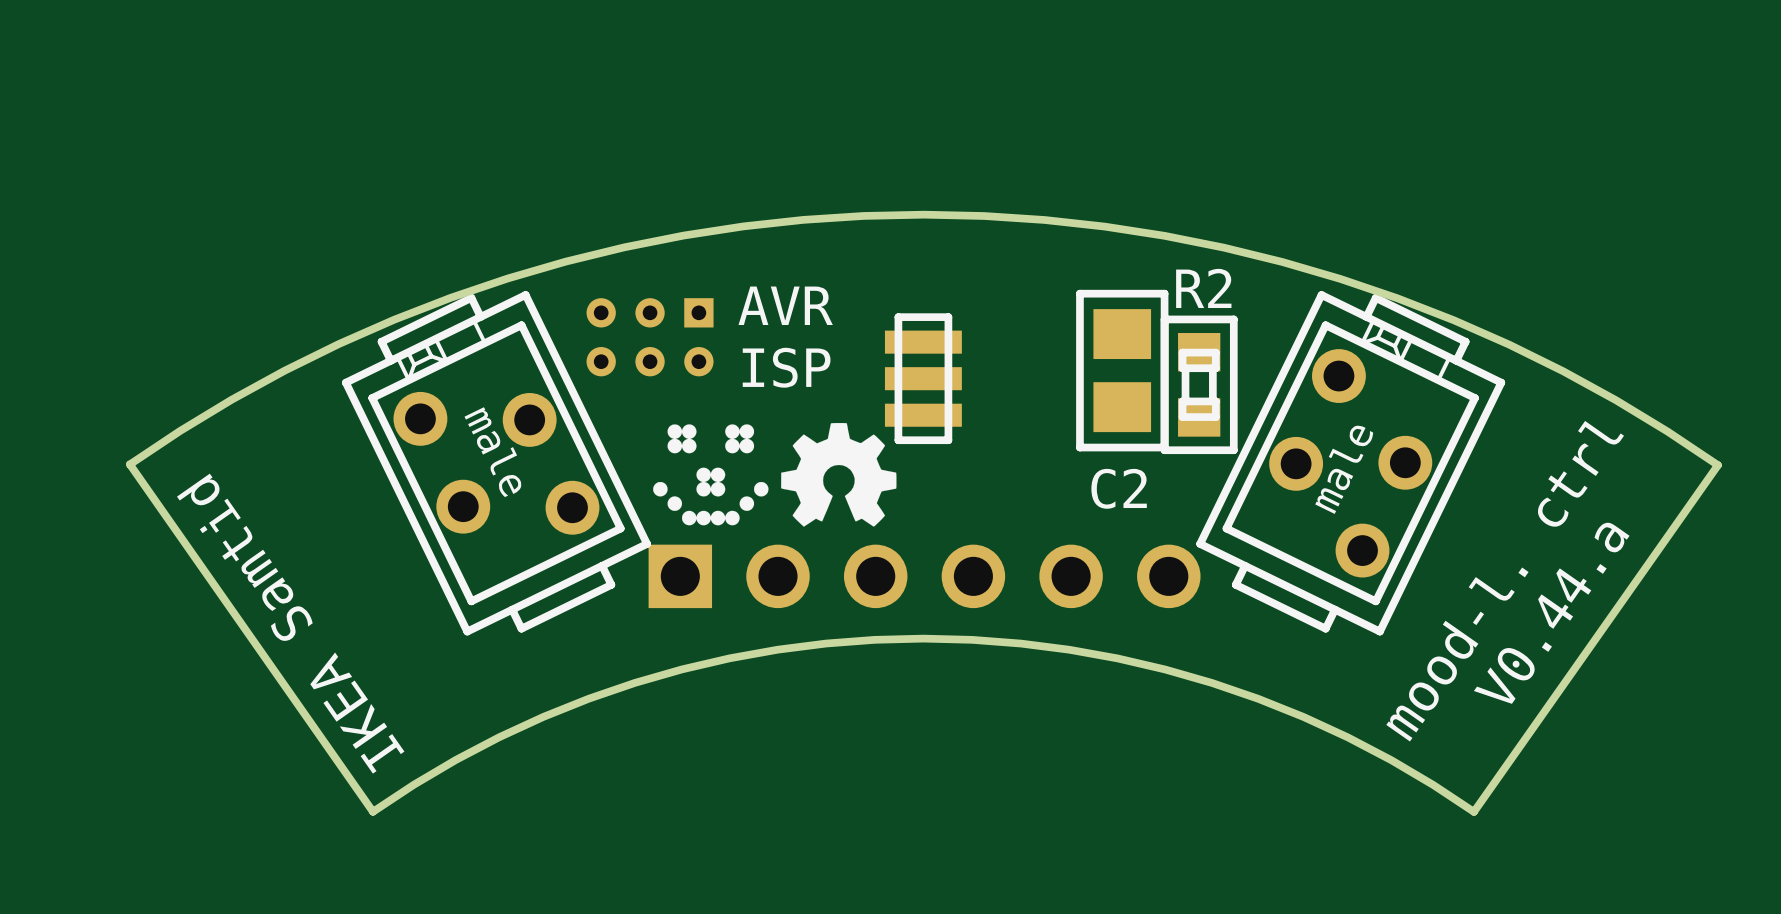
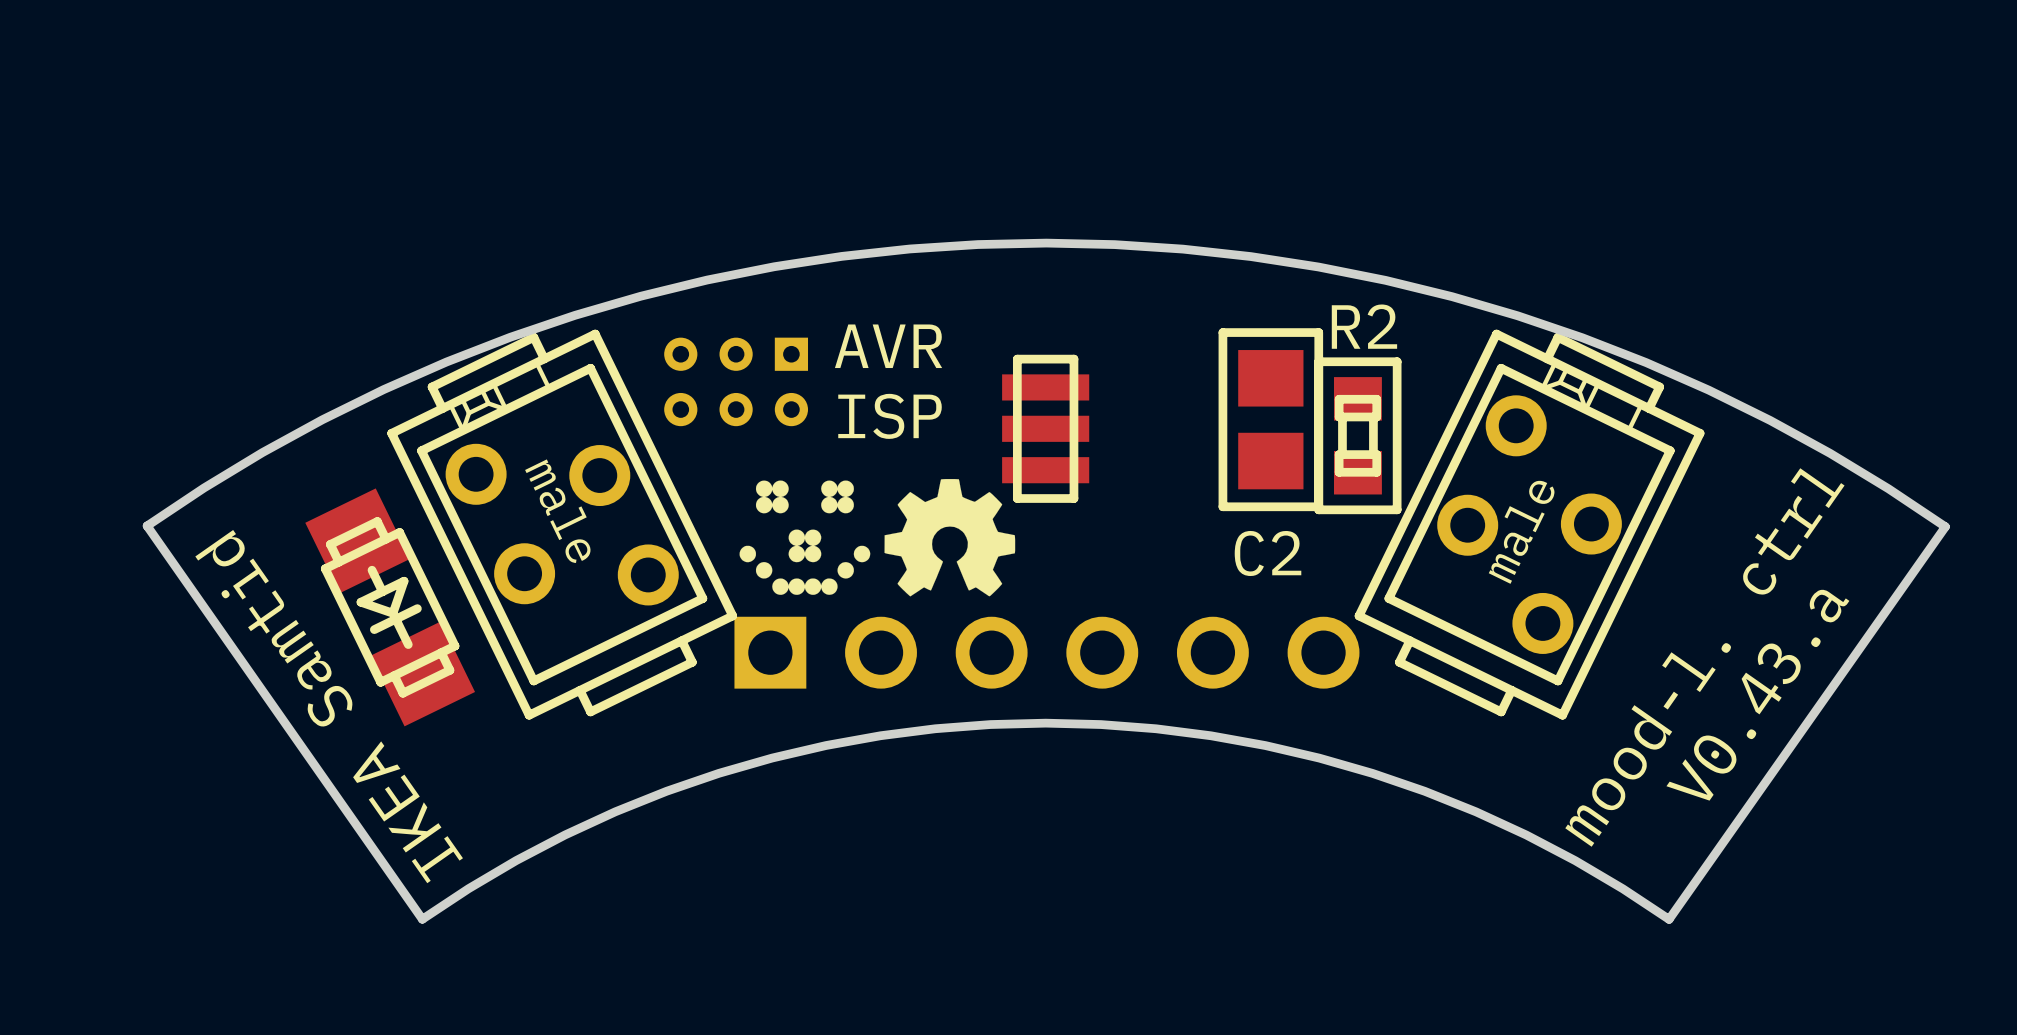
part: none -> (390, 607)
text: V0.44.a (1551, 613) -> V0.43.a (1757, 694)

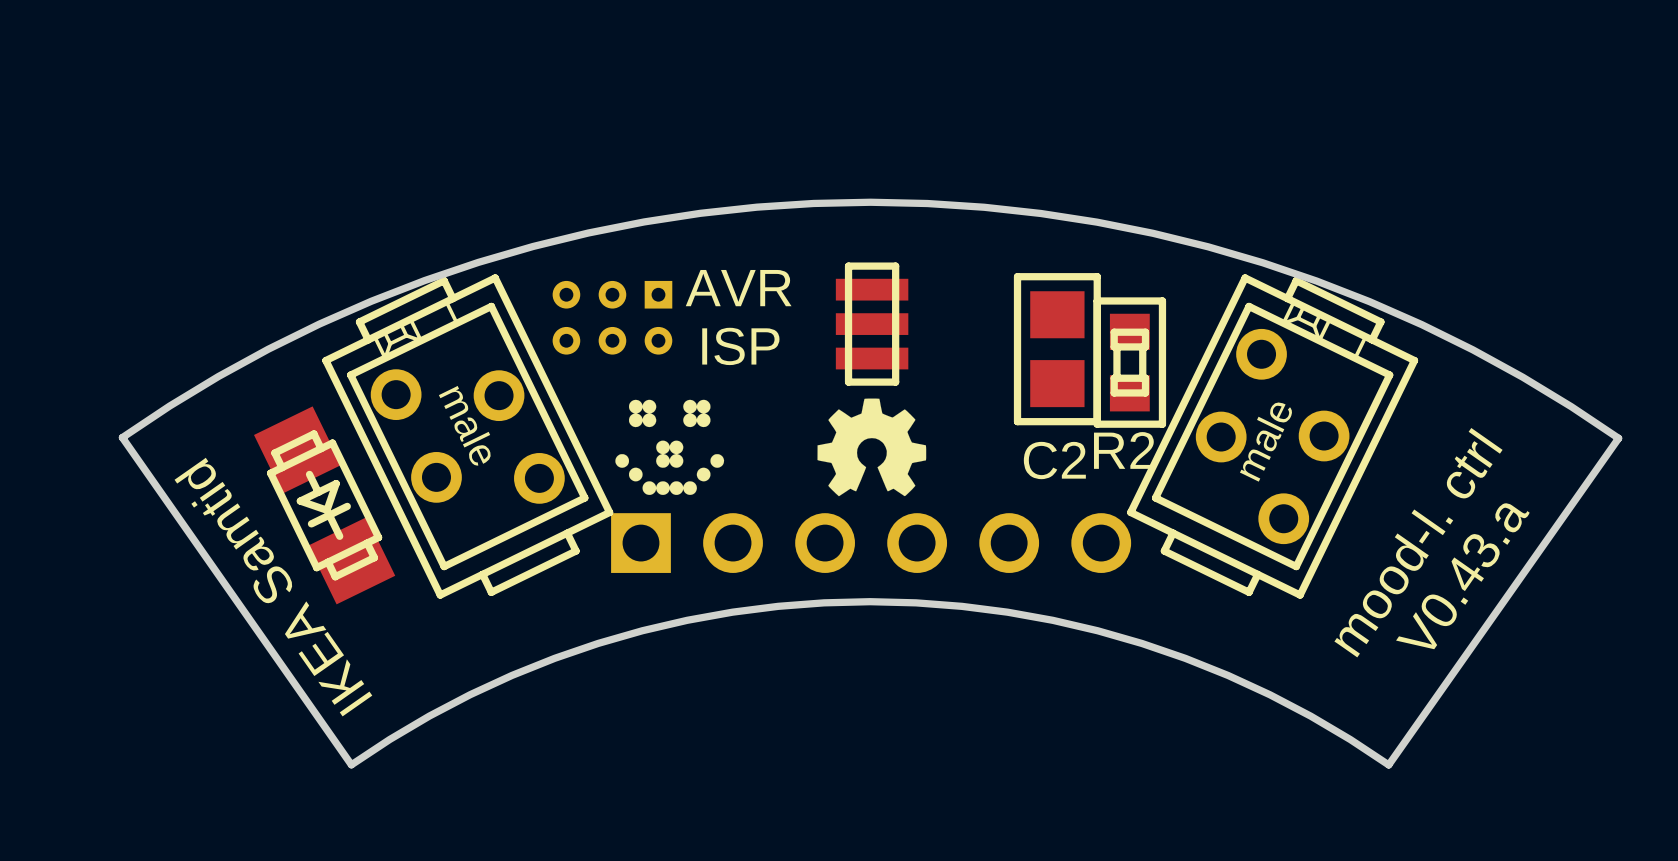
R2 name position: R2 (1364, 326) -> R2 (1124, 450)
part position: (1045, 428) -> (872, 324)
drawing position: (949, 537) -> (871, 447)

